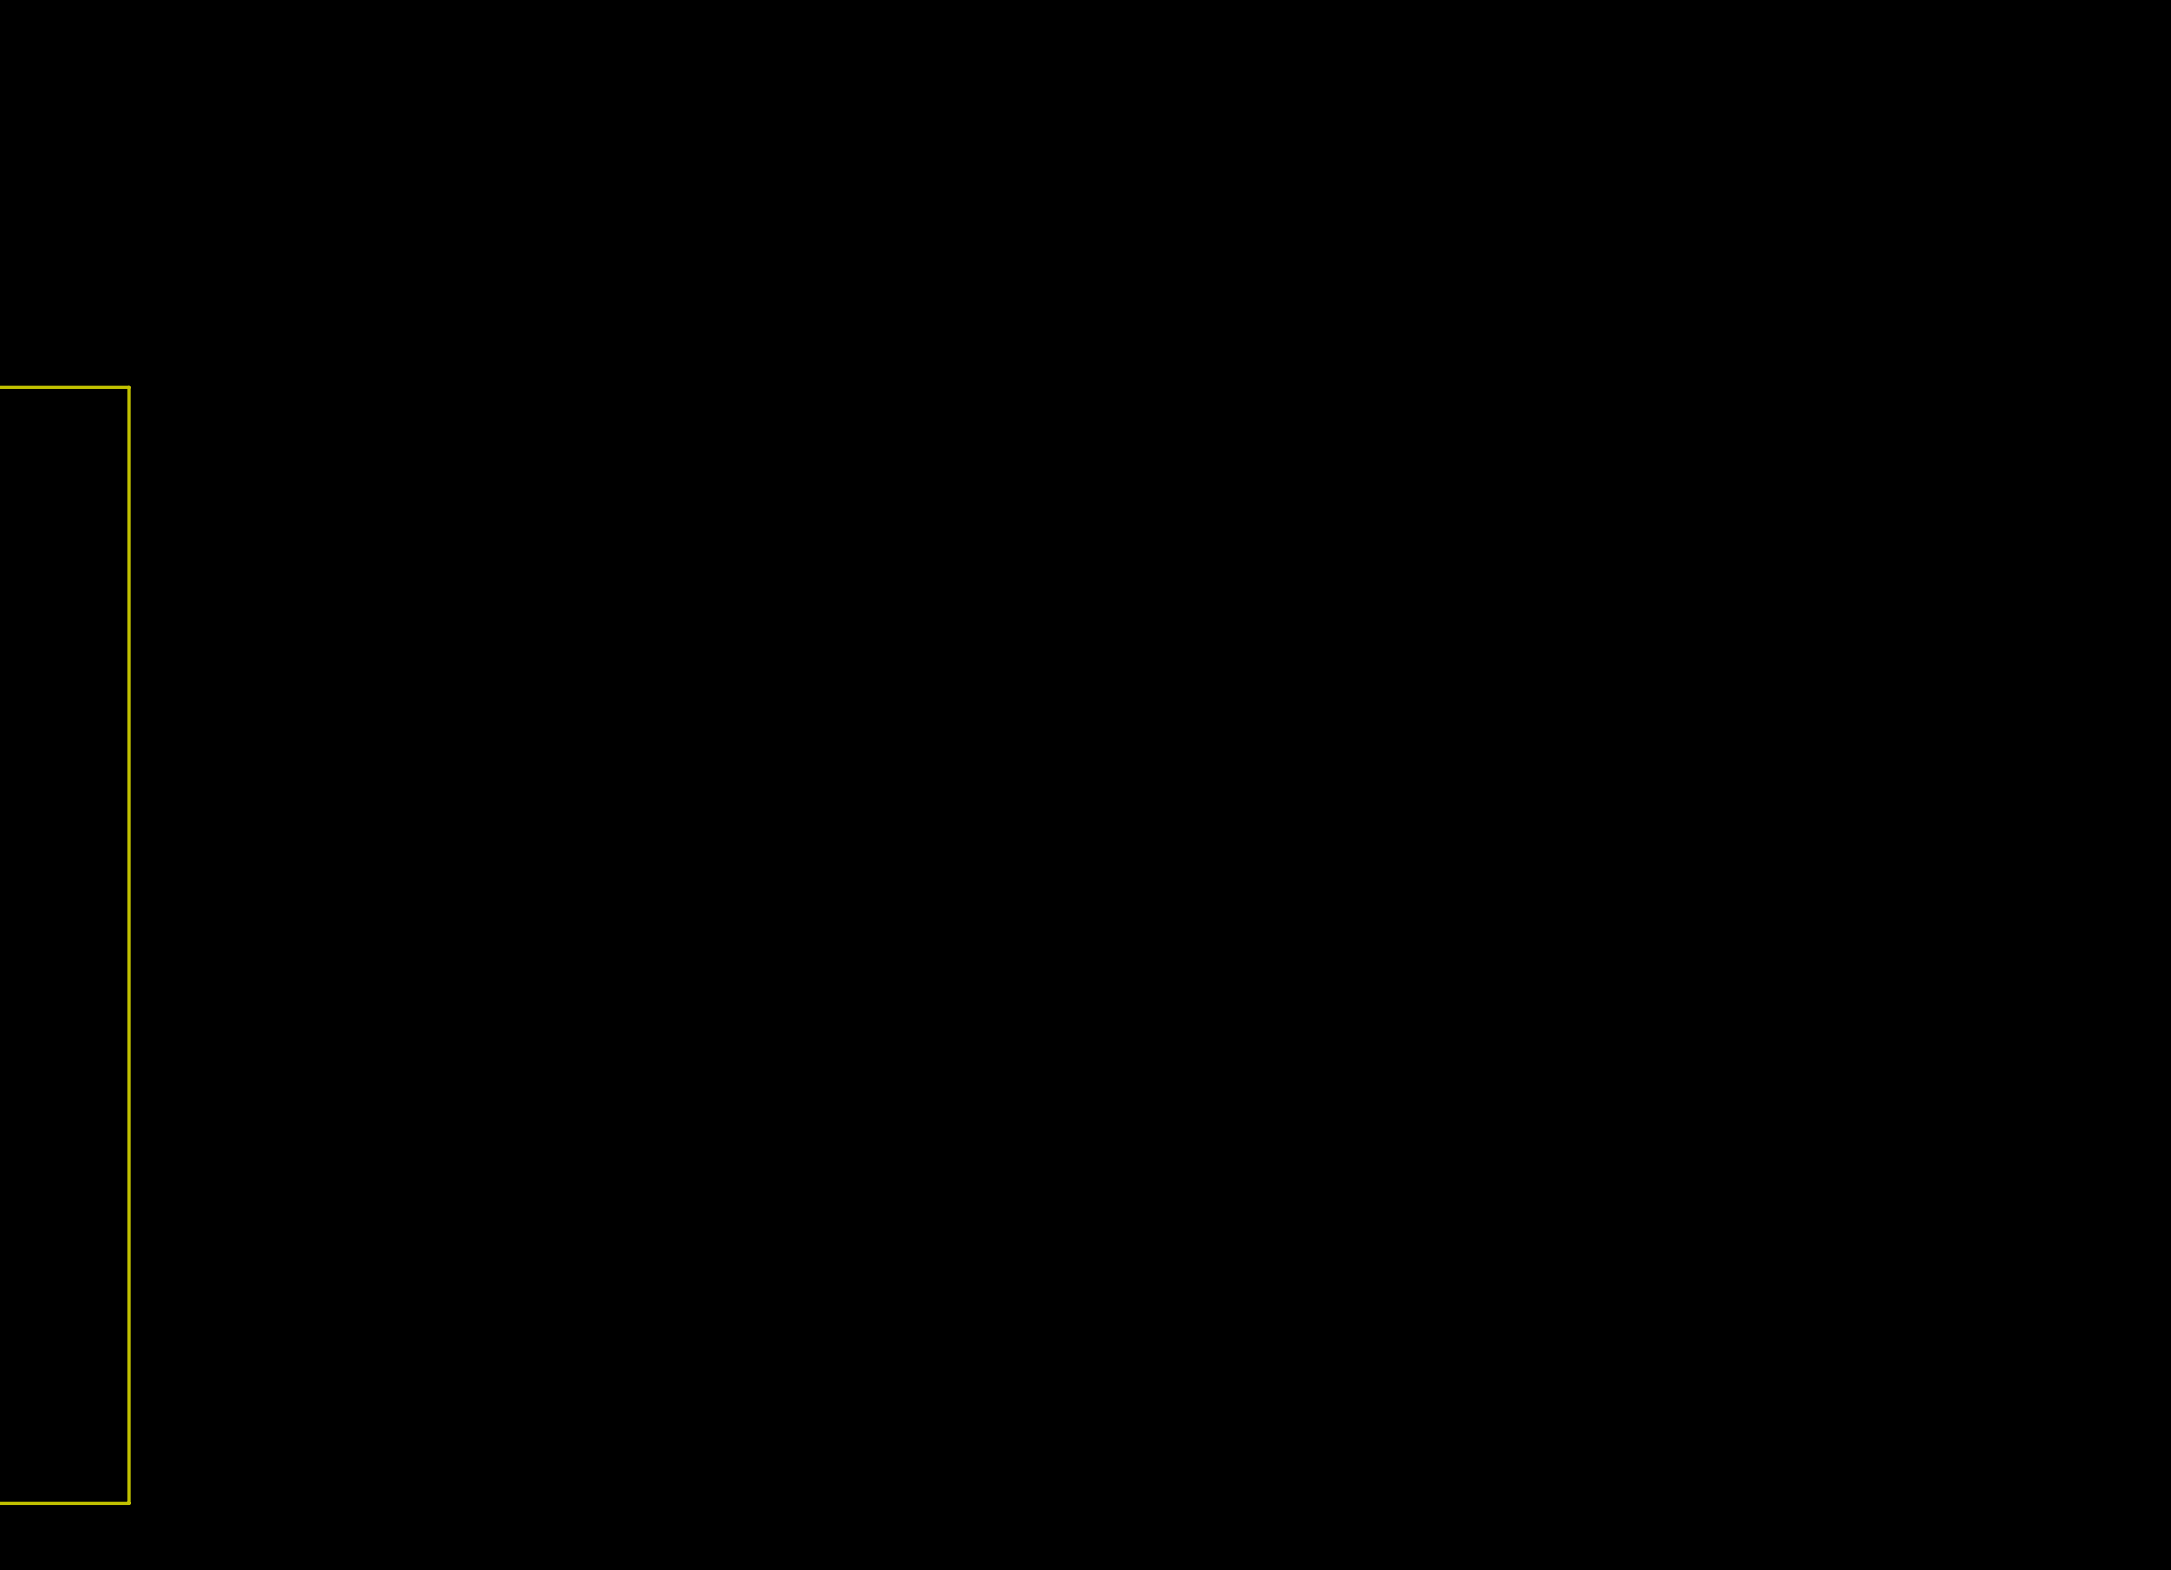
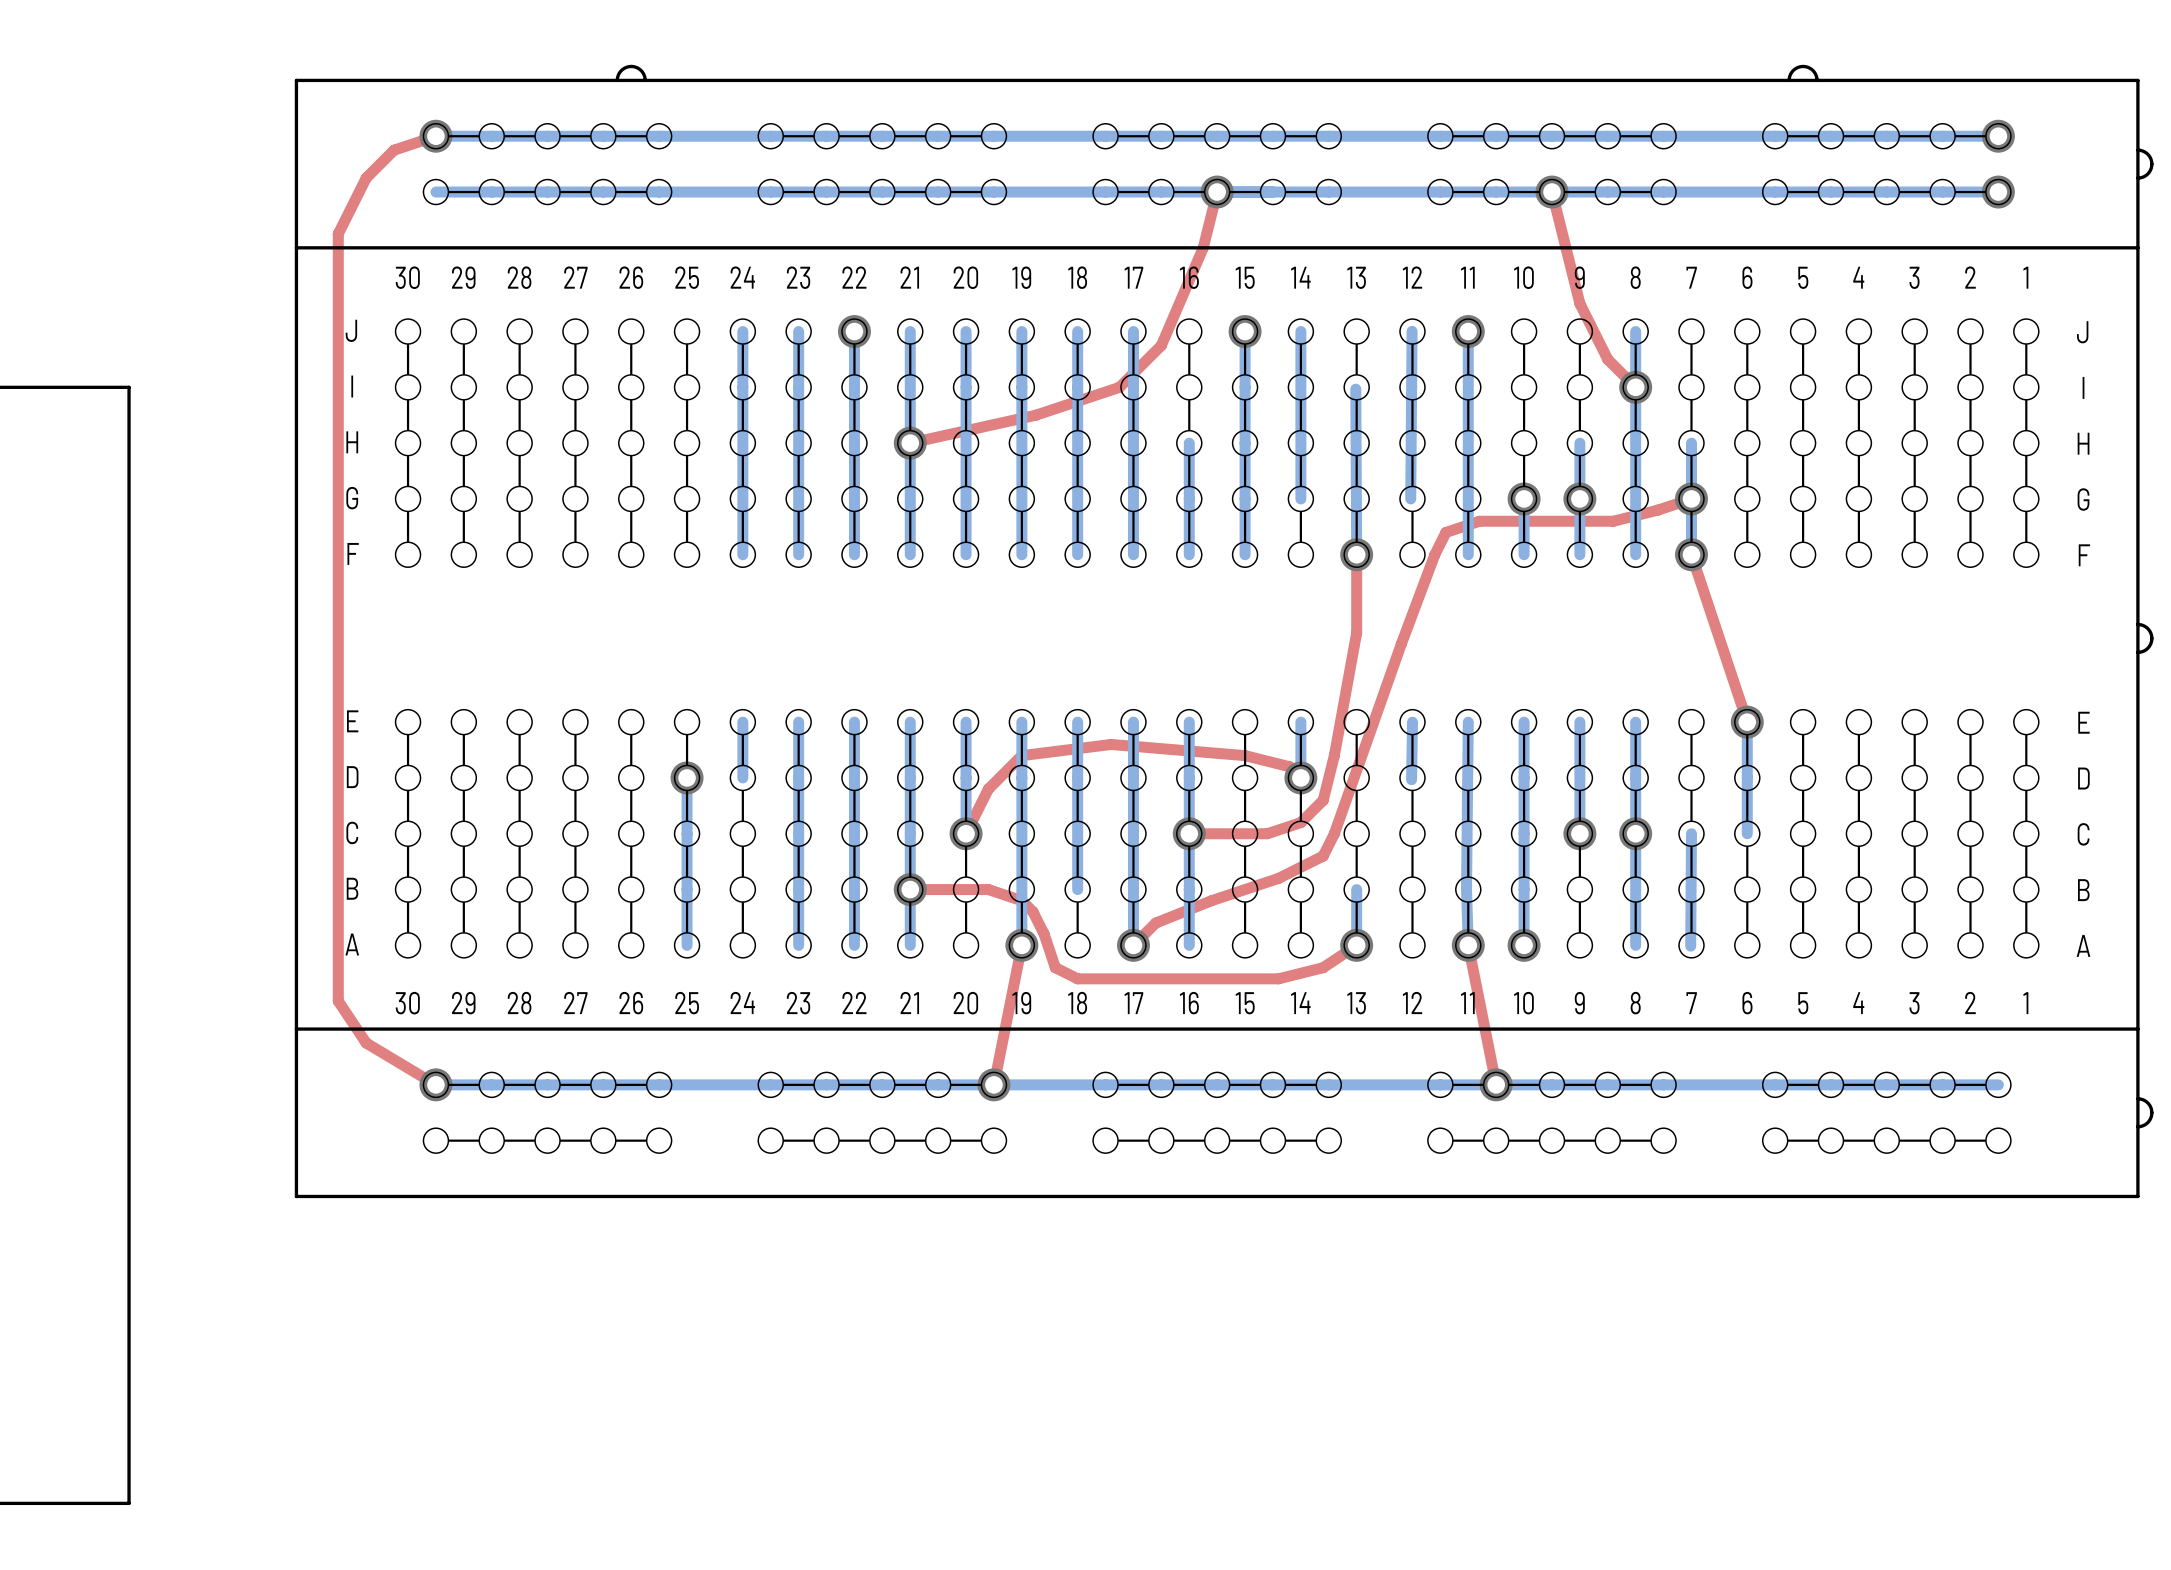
drawing: none -> [294, 64, 2154, 1199]
top track: none -> (435, 136) (394, 150) (366, 178) (338, 233) (338, 1001) (366, 1043) (435, 1084)
via: none -> (435, 136)
bottom track: none -> (1998, 136) (435, 136)
via: none -> (1998, 136)
top track: none -> (1217, 192) (1203, 247) (1161, 345) (1119, 387) (1035, 415) (910, 443)
via: none -> (1217, 192)
top track: none -> (1551, 192) (1579, 303) (1607, 359) (1635, 387)
via: none -> (1551, 192)
bottom track: none -> (1998, 192) (435, 192)
via: none -> (1998, 192)
bottom track: none -> (742, 331) (742, 554)
bottom track: none -> (798, 331) (798, 554)
bottom track: none -> (854, 331) (854, 554)
via: none -> (854, 331)
bottom track: none -> (910, 331) (910, 554)
bottom track: none -> (966, 331) (966, 554)
bottom track: none -> (1021, 331) (1021, 554)
bottom track: none -> (1077, 331) (1077, 554)
bottom track: none -> (1133, 331) (1133, 554)
bottom track: none -> (1245, 331) (1245, 554)
via: none -> (1245, 331)
bottom track: none -> (1300, 331) (1300, 498)
bottom track: none -> (1412, 331) (1410, 498)
bottom track: none -> (1468, 331) (1468, 554)
via: none -> (1468, 331)
bottom track: none -> (1635, 331) (1635, 554)
via: none -> (1635, 387)
bottom track: none -> (1355, 389) (1356, 554)
via: none -> (910, 443)
bottom track: none -> (1189, 443) (1189, 554)
bottom track: none -> (1579, 443) (1579, 554)
bottom track: none -> (1691, 443) (1691, 554)
bottom track: none -> (1524, 498) (1524, 554)
via: none -> (1524, 498)
via: none -> (1579, 498)
top track: none -> (1691, 498) (1658, 510) (1613, 521) (1479, 521) (1445, 532) (1434, 554) (1334, 833) (1323, 856) (1278, 878) (1211, 900) (1155, 923) (1133, 945)
via: none -> (1691, 498)
top track: none -> (1356, 554) (1356, 632) (1334, 755) (1323, 800) (1300, 822) (1267, 833) (1189, 833)
via: none -> (1356, 554)
top track: none -> (1691, 554) (1747, 722)
via: none -> (1691, 554)
bottom track: none -> (742, 722) (742, 777)
bottom track: none -> (798, 722) (798, 945)
bottom track: none -> (854, 722) (854, 945)
bottom track: none -> (910, 722) (910, 945)
bottom track: none -> (966, 722) (966, 833)
bottom track: none -> (1021, 722) (1021, 945)
bottom track: none -> (1077, 722) (1077, 889)
bottom track: none -> (1133, 722) (1133, 945)
bottom track: none -> (1189, 722) (1189, 945)
bottom track: none -> (1300, 722) (1300, 777)
bottom track: none -> (1412, 722) (1411, 779)
bottom track: none -> (1468, 722) (1466, 889) (1468, 945)
bottom track: none -> (1524, 722) (1524, 945)
bottom track: none -> (1579, 722) (1579, 833)
bottom track: none -> (1635, 722) (1635, 945)
bottom track: none -> (1747, 722) (1747, 833)
via: none -> (1747, 722)
bottom track: none -> (687, 777) (687, 945)
via: none -> (687, 777)
top track: none -> (1300, 777) (1289, 766) (1245, 755) (1111, 744) (1021, 755) (988, 789) (966, 833)
via: none -> (1300, 777)
via: none -> (966, 833)
via: none -> (1189, 833)
via: none -> (1579, 833)
via: none -> (1635, 833)
bottom track: none -> (1691, 833) (1690, 946)
top track: none -> (910, 889) (988, 889) (1021, 900) (1033, 911) (1044, 934) (1055, 967) (1077, 978) (1278, 978) (1323, 967) (1356, 945)
via: none -> (910, 889)
bottom track: none -> (1356, 889) (1356, 945)
top track: none -> (1021, 945) (993, 1084)
via: none -> (1021, 945)
via: none -> (1133, 945)
via: none -> (1356, 945)
top track: none -> (1468, 945) (1496, 1084)
via: none -> (1468, 945)
via: none -> (1524, 945)
via: none -> (435, 1084)
via: none -> (993, 1084)
via: none -> (1496, 1084)
bottom track: none -> (1998, 1084) (435, 1084)

